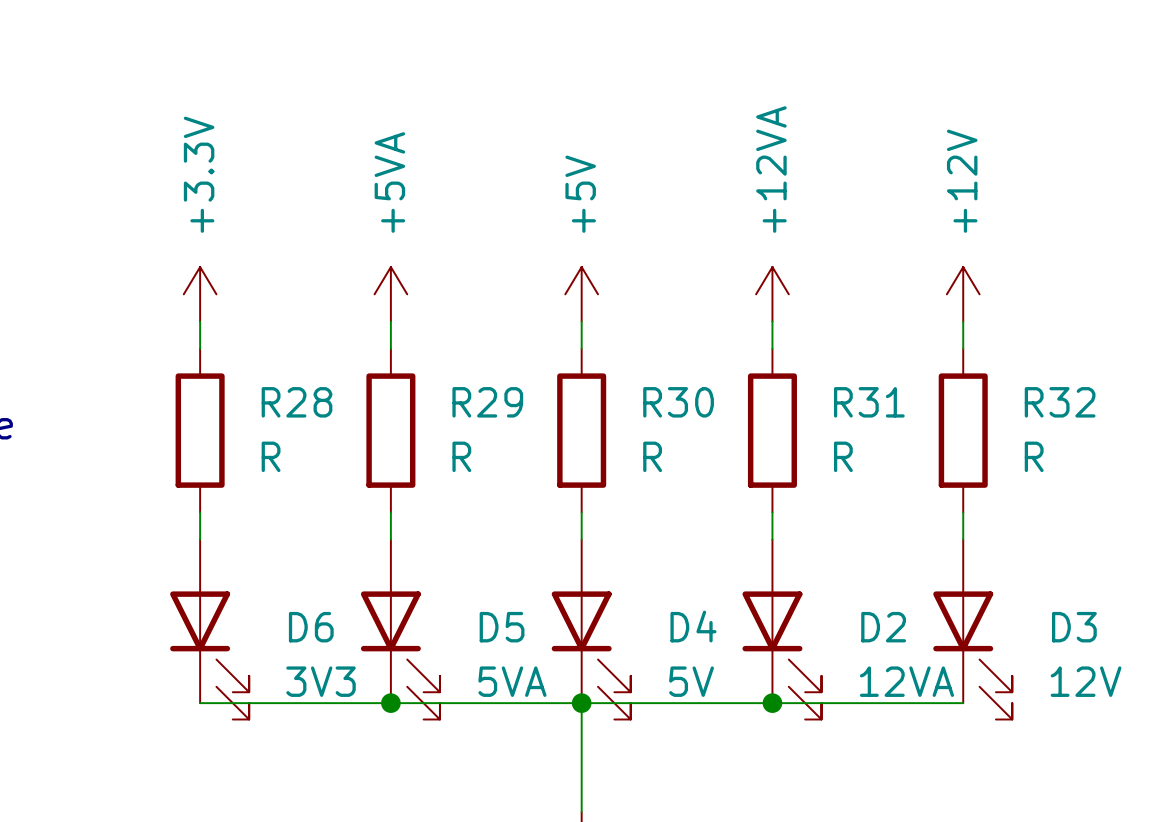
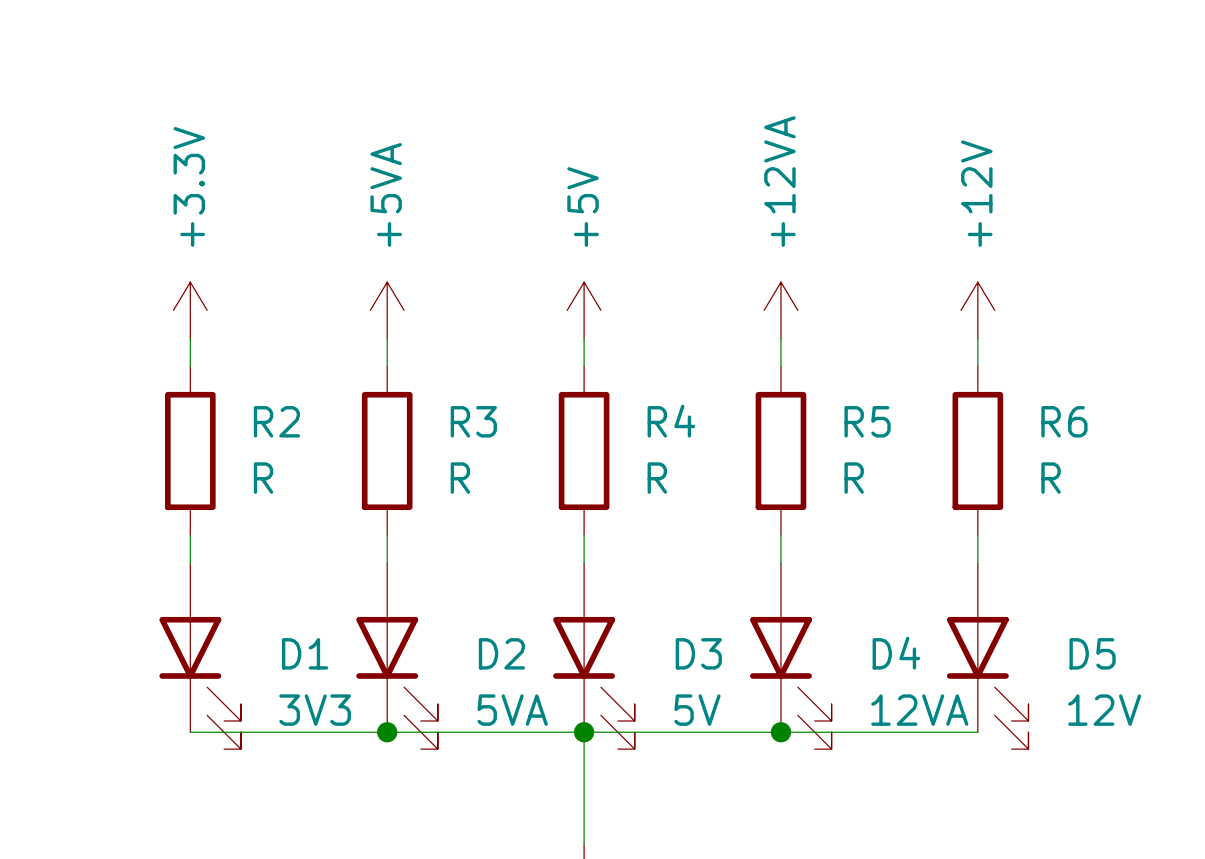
R28 name: R28 (297, 402) -> R2 (276, 421)
R29 name: R29 (487, 402) -> R3 (473, 421)
R30 name: R30 (678, 402) -> R4 (671, 421)
R31 name: R31 (869, 402) -> R5 (867, 421)
R32 name: R32 (1060, 402) -> R6 (1064, 421)
D4 name: D4 (693, 626) -> D3 (698, 653)
D6 name: D6 (311, 627) -> D1 (305, 653)
D5 name: D5 (502, 627) -> D2 (501, 653)
D2 name: D2 (883, 627) -> D4 (896, 653)
D3 name: D3 (1074, 627) -> D5 (1092, 653)

